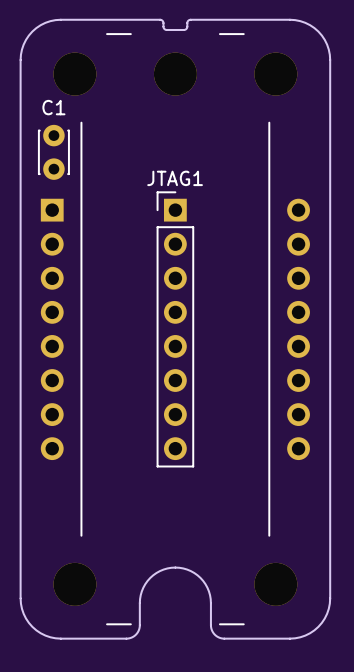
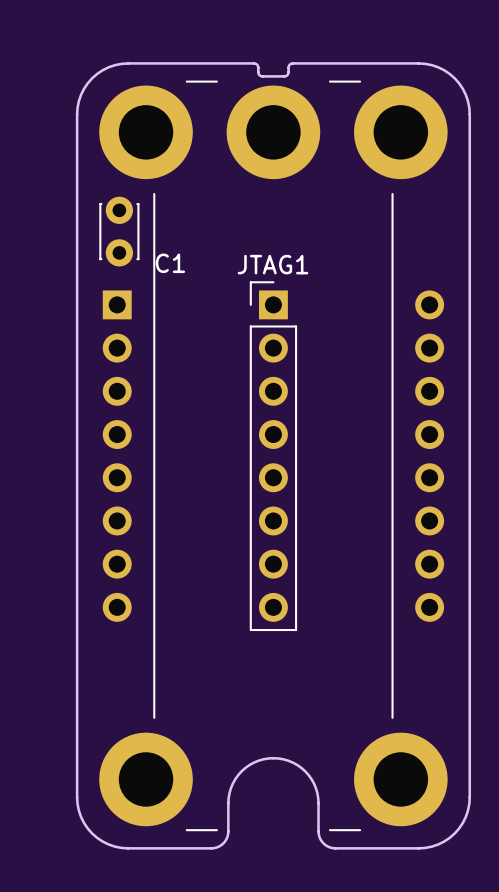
part footprint: [53, 52, 97, 96] -> [99, 85, 193, 180]
part footprint: [153, 52, 197, 96] -> [226, 85, 321, 180]
part footprint: [254, 52, 298, 96] -> [354, 85, 448, 180]
C1 name position: C1 (53, 107) -> C1 (170, 263)
part footprint: [53, 562, 97, 606] -> [99, 732, 193, 827]
part footprint: [254, 562, 298, 606] -> [354, 732, 448, 827]

